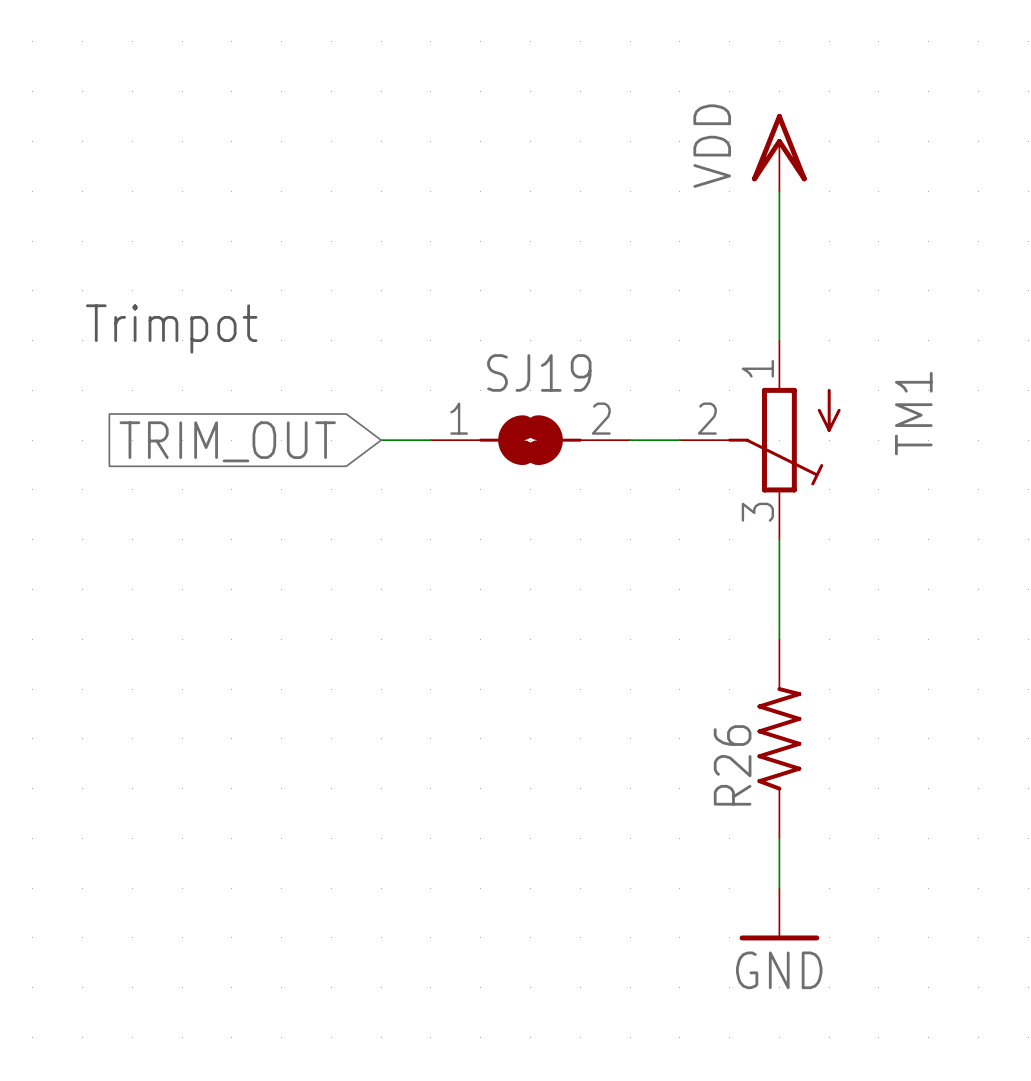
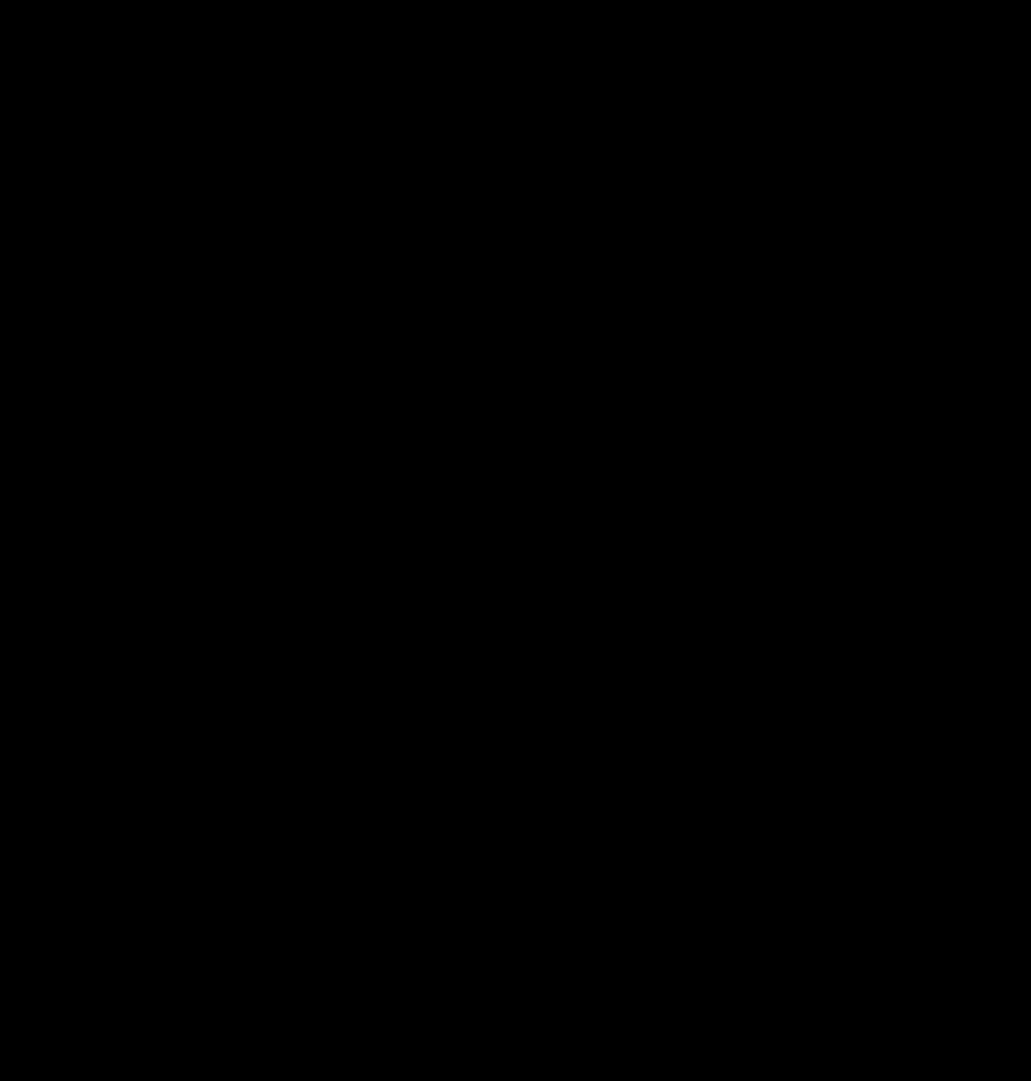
power symbol: VDD (779, 152) -> none
wire: (779, 191) (779, 340) -> none
text: Trimpot (171, 328) -> none
wire: (381, 440) (430, 440) -> none
SJ19: (530, 440) -> none
wire: (630, 440) (679, 440) -> none
TM1: (760, 440) -> none
global label: TRIM_OUT (227, 441) -> none
wire: (779, 539) (779, 639) -> none
R26: (779, 738) -> none
wire: (779, 838) (779, 888) -> none
power symbol: GND (779, 914) -> none

